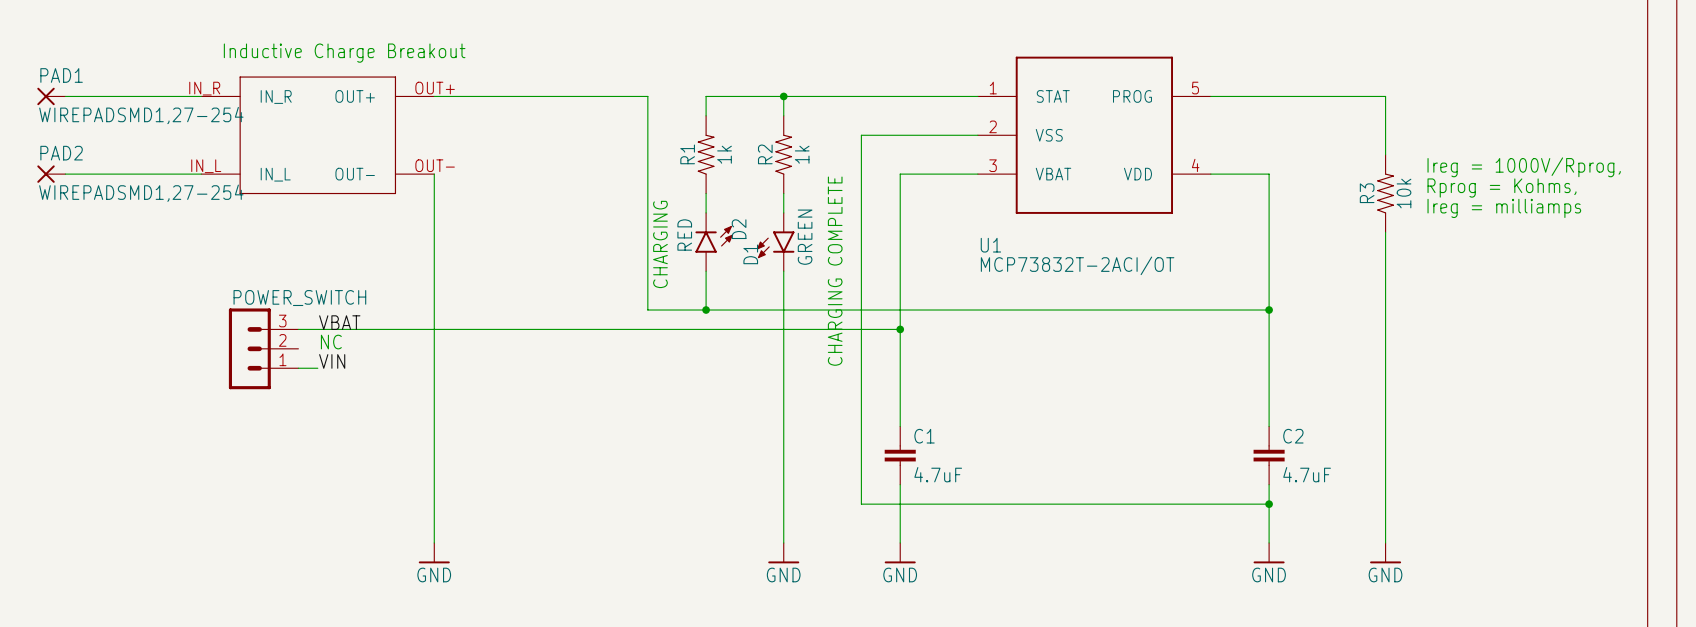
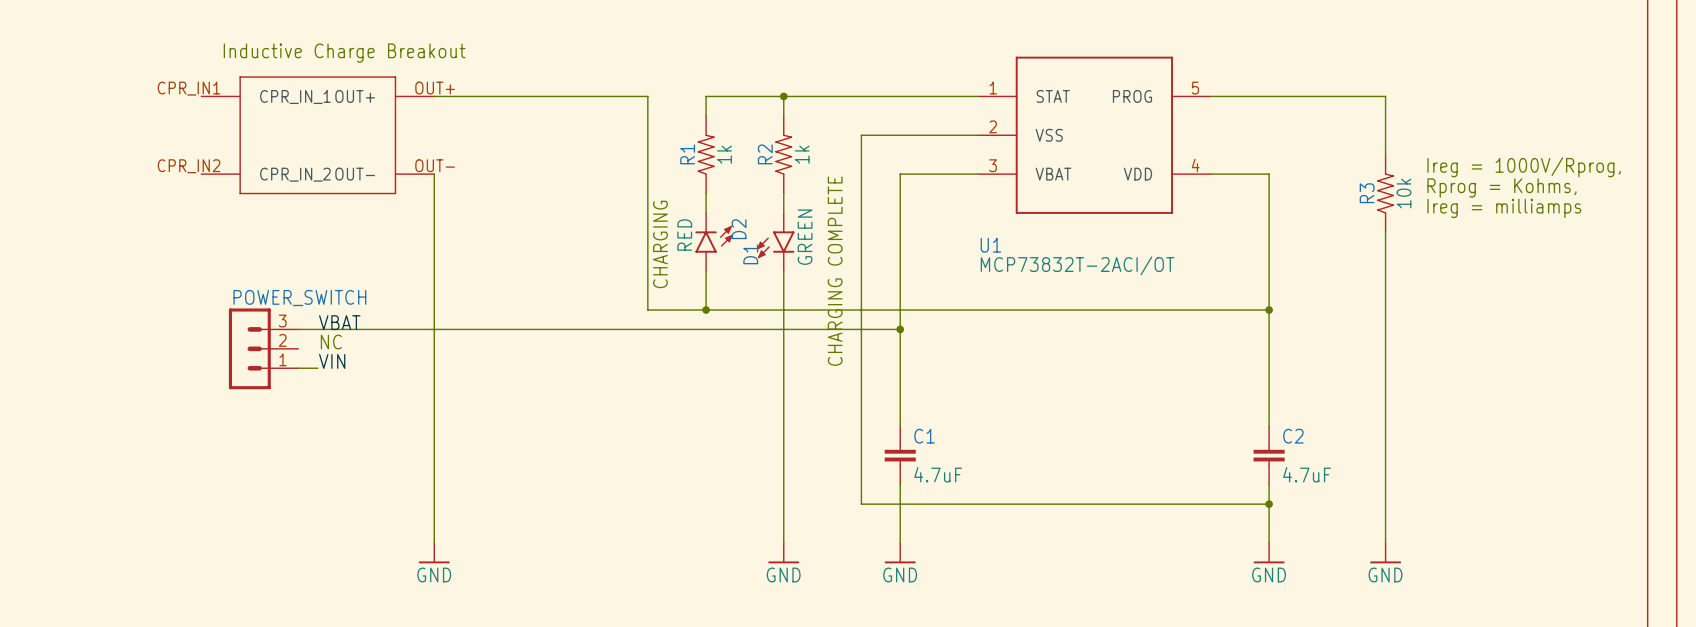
part pin number: IN_R (204, 88) -> CPR_IN1 (189, 88)
PAD1: WIREPADSMD1,27-254 (51, 96) -> none
wire: (65, 96) (201, 96) -> none
part pin name: IN_R (276, 97) -> CPR_IN_1 (295, 97)
part pin number: IN_L (206, 166) -> CPR_IN2 (189, 166)
PAD2: WIREPADSMD1,27-254 (51, 174) -> none
wire: (65, 174) (201, 174) -> none
part pin name: IN_L (275, 174) -> CPR_IN_2 (295, 174)

